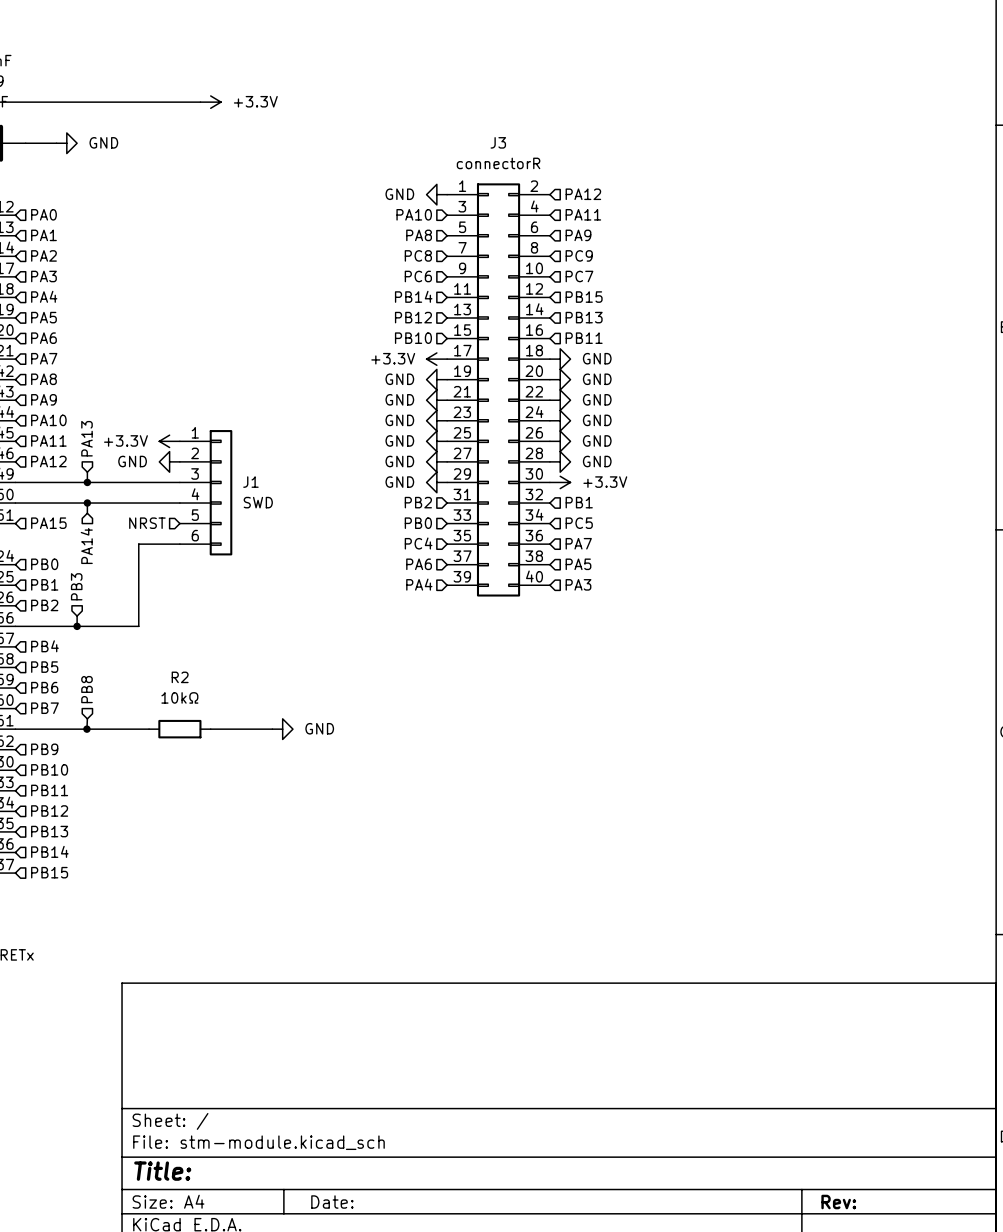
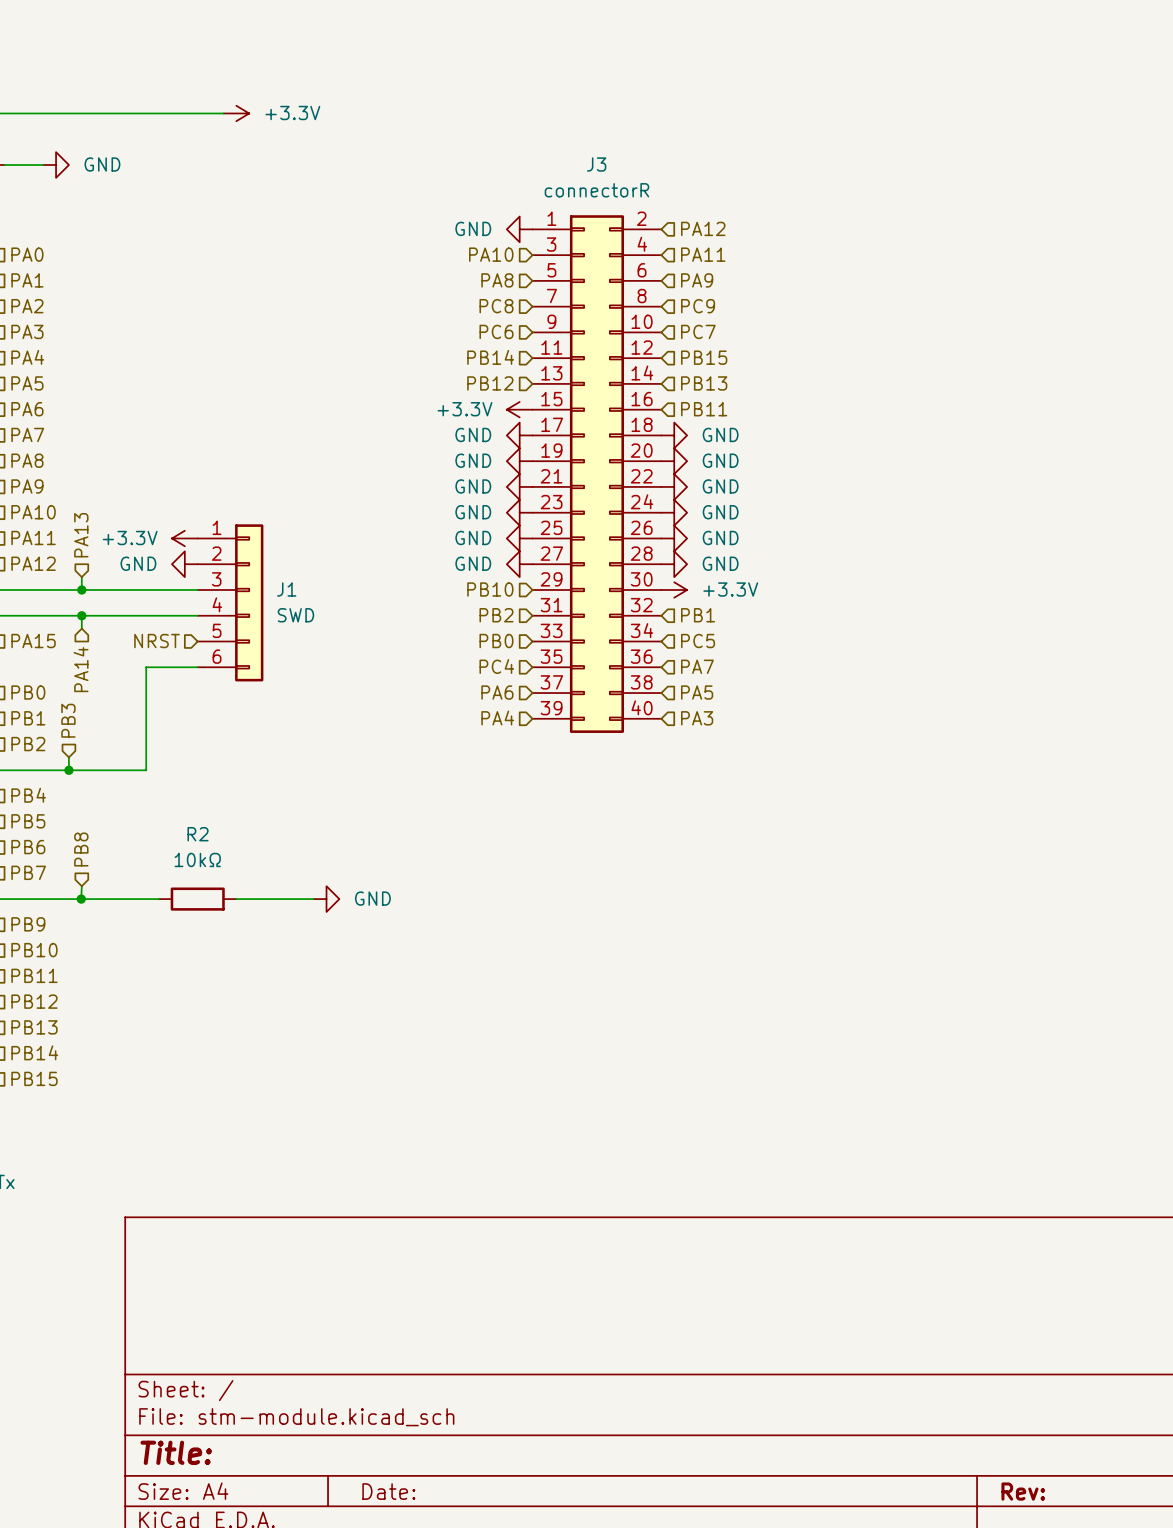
hierarchical label position: PB10 (413, 338) -> PB10 (490, 589)
power symbol: none -> +3.3V (519, 409)
power symbol: +3.3V (436, 359) -> GND (519, 435)
power symbol: GND (436, 482) -> none

